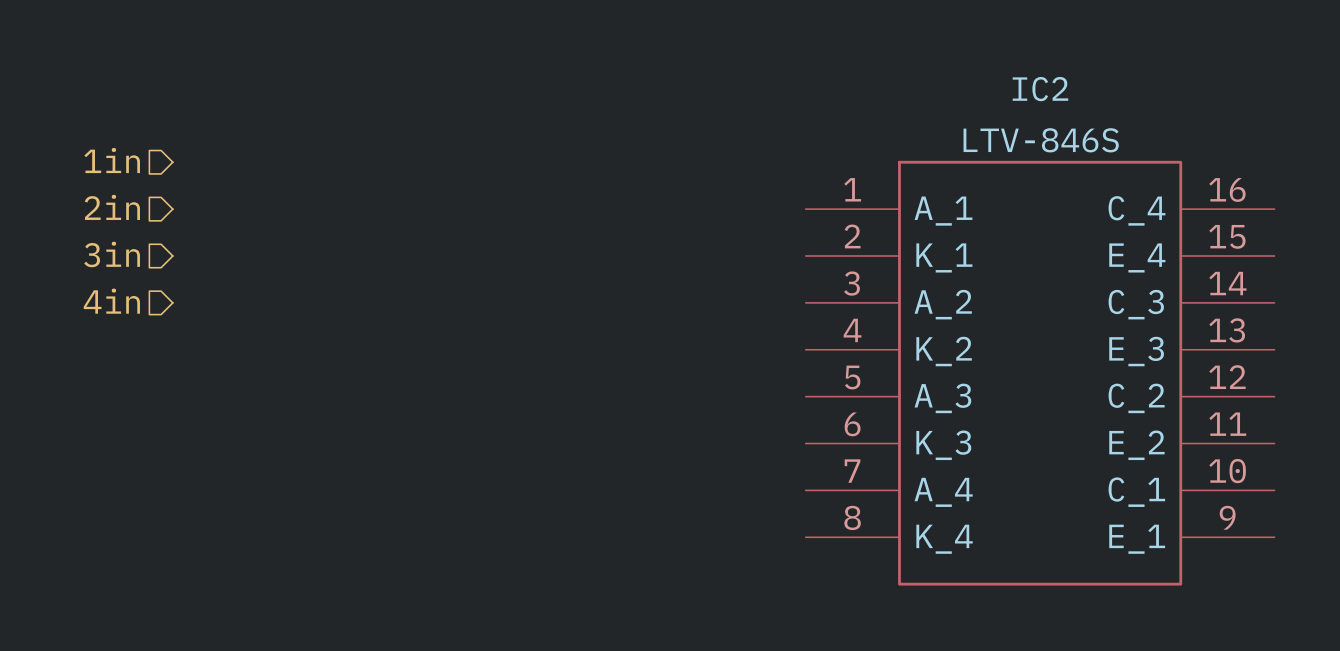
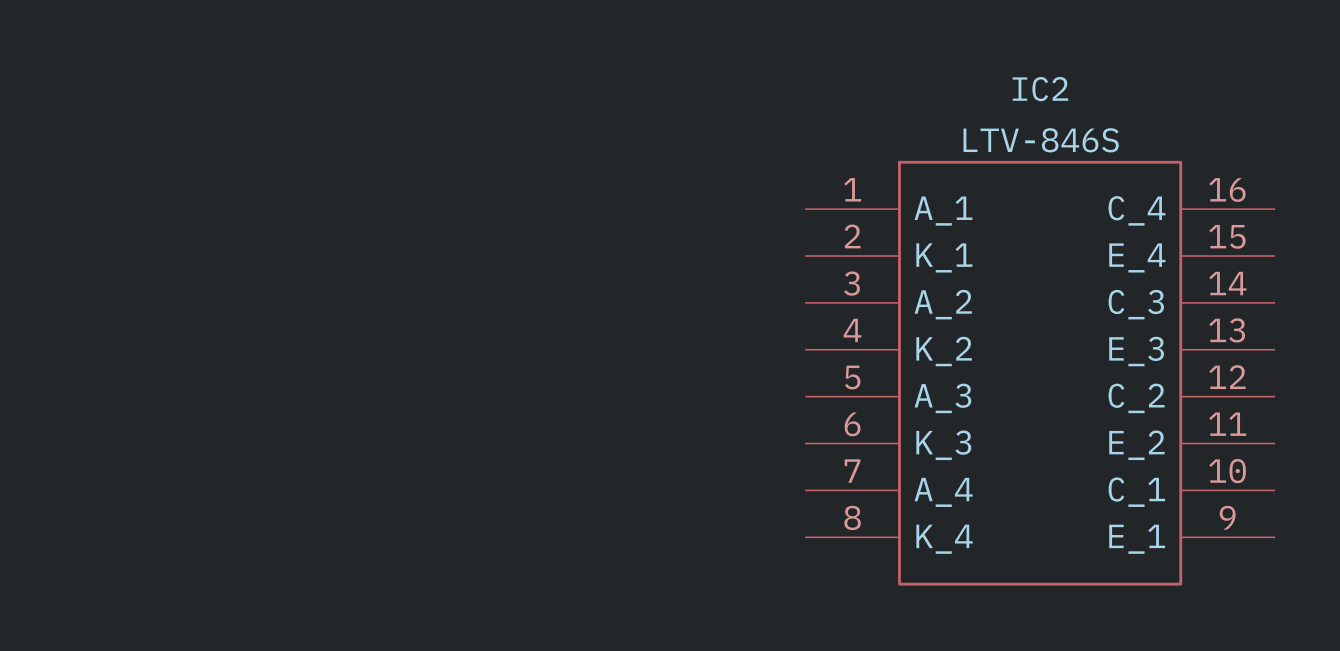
hierarchical label: 1in (112, 160) -> none
hierarchical label: 2in (112, 207) -> none
hierarchical label: 3in (112, 254) -> none
hierarchical label: 4in (111, 301) -> none

